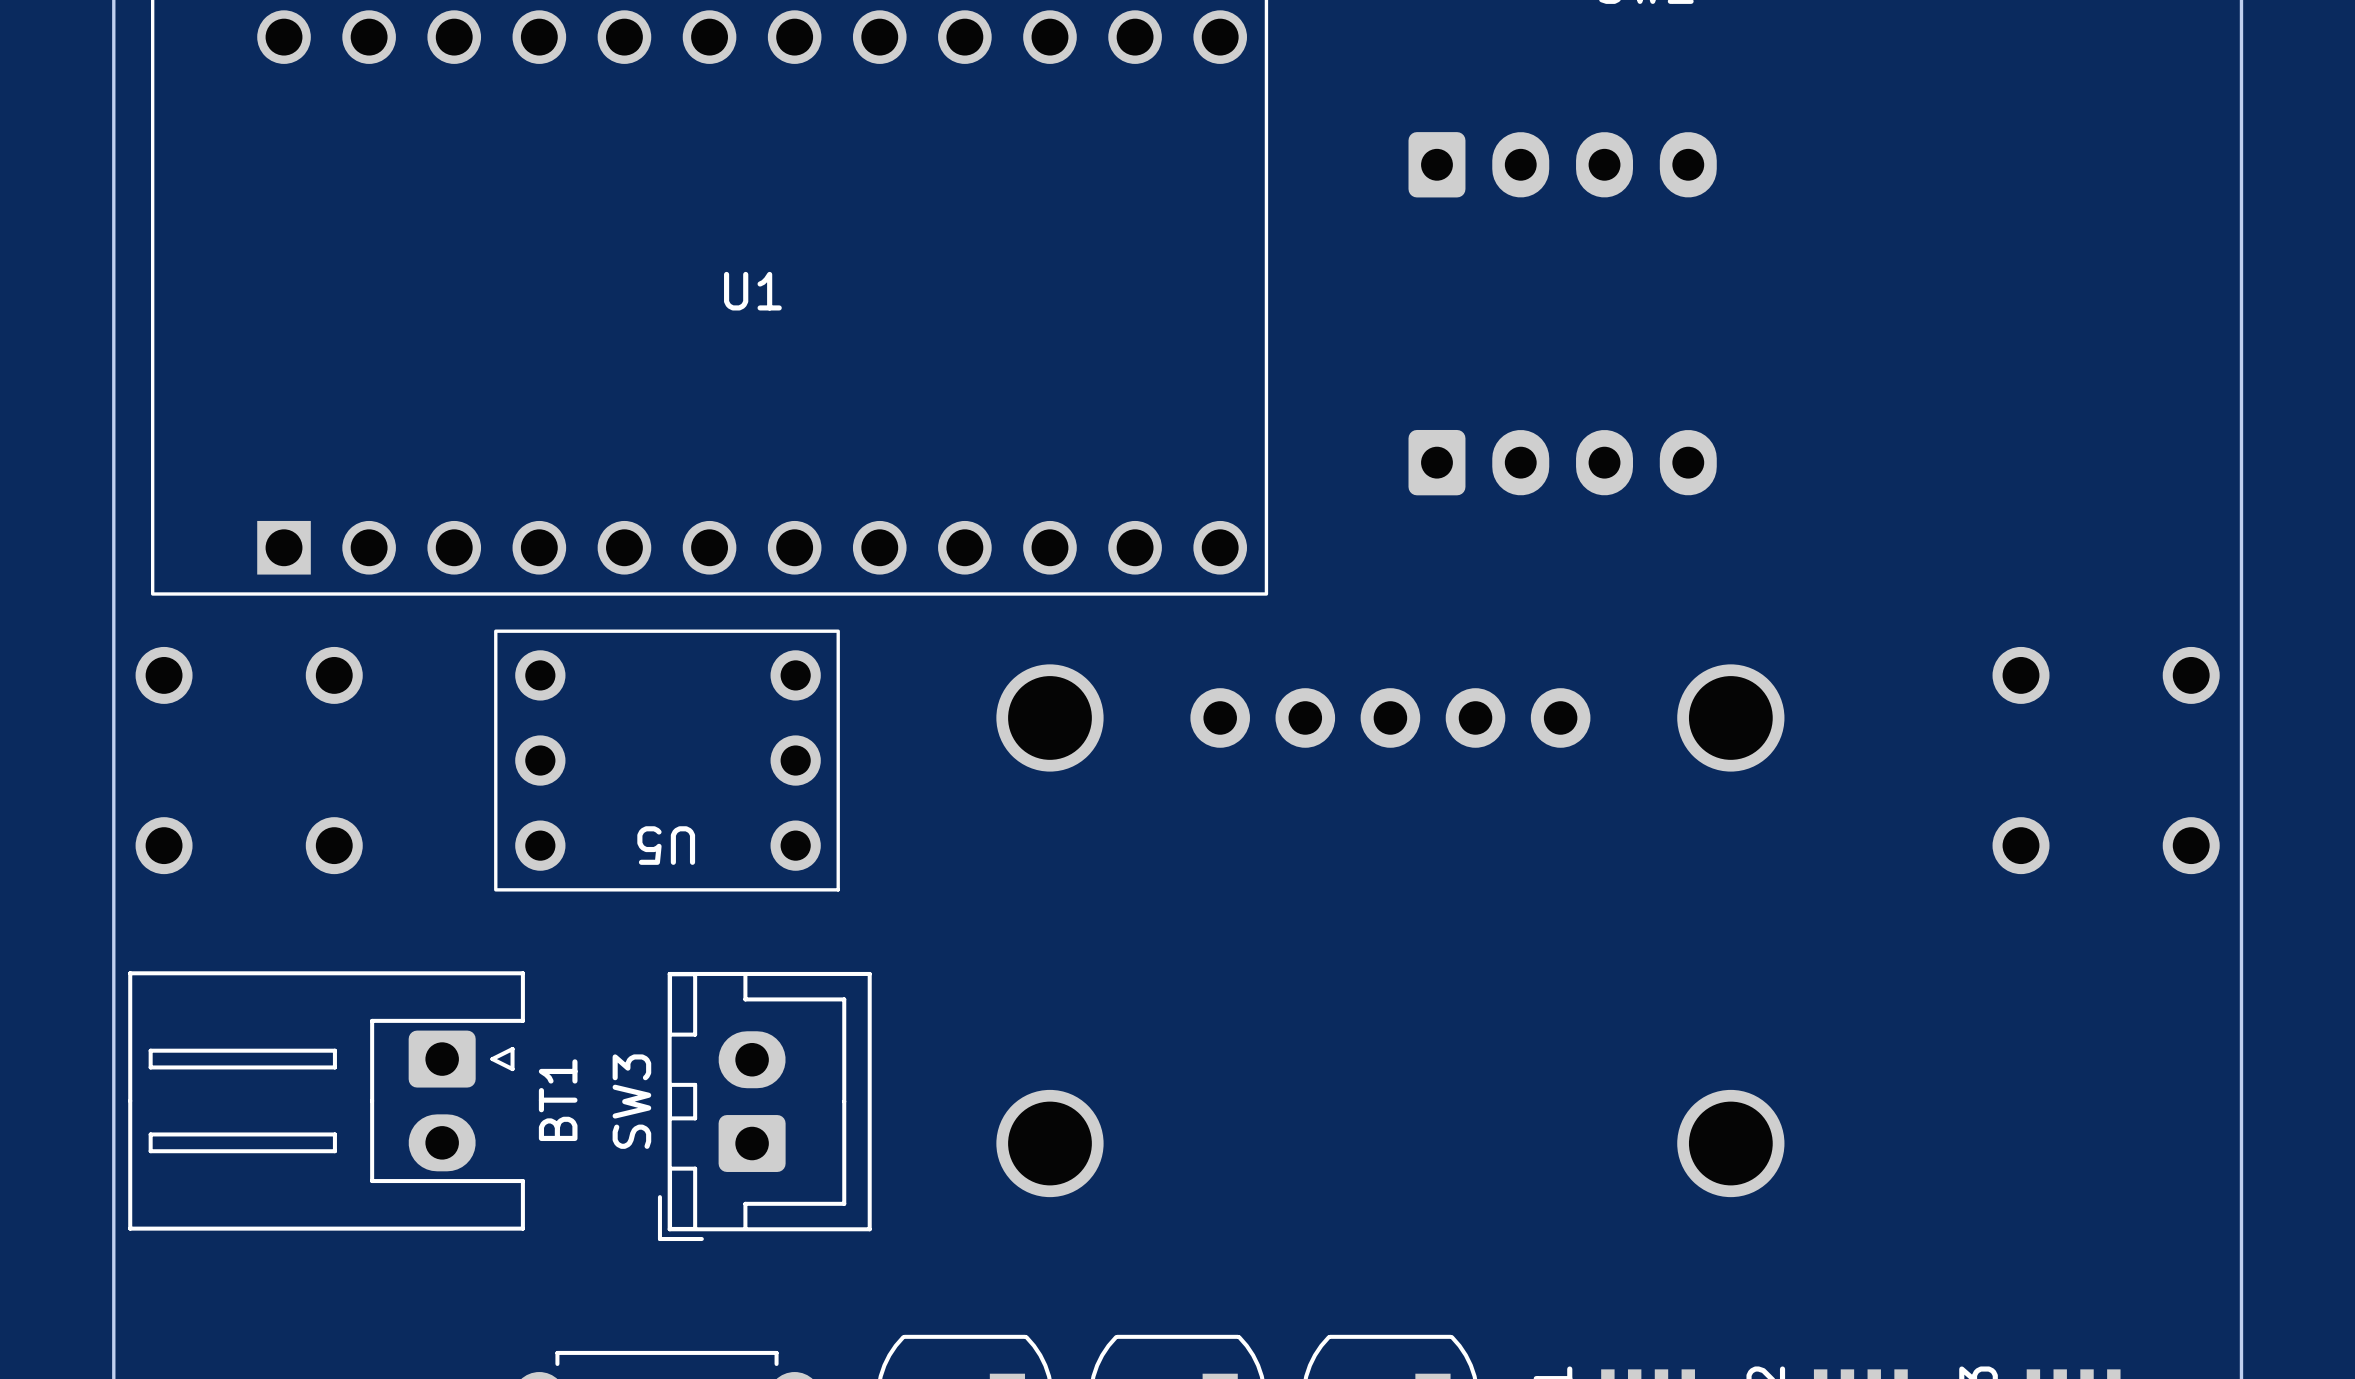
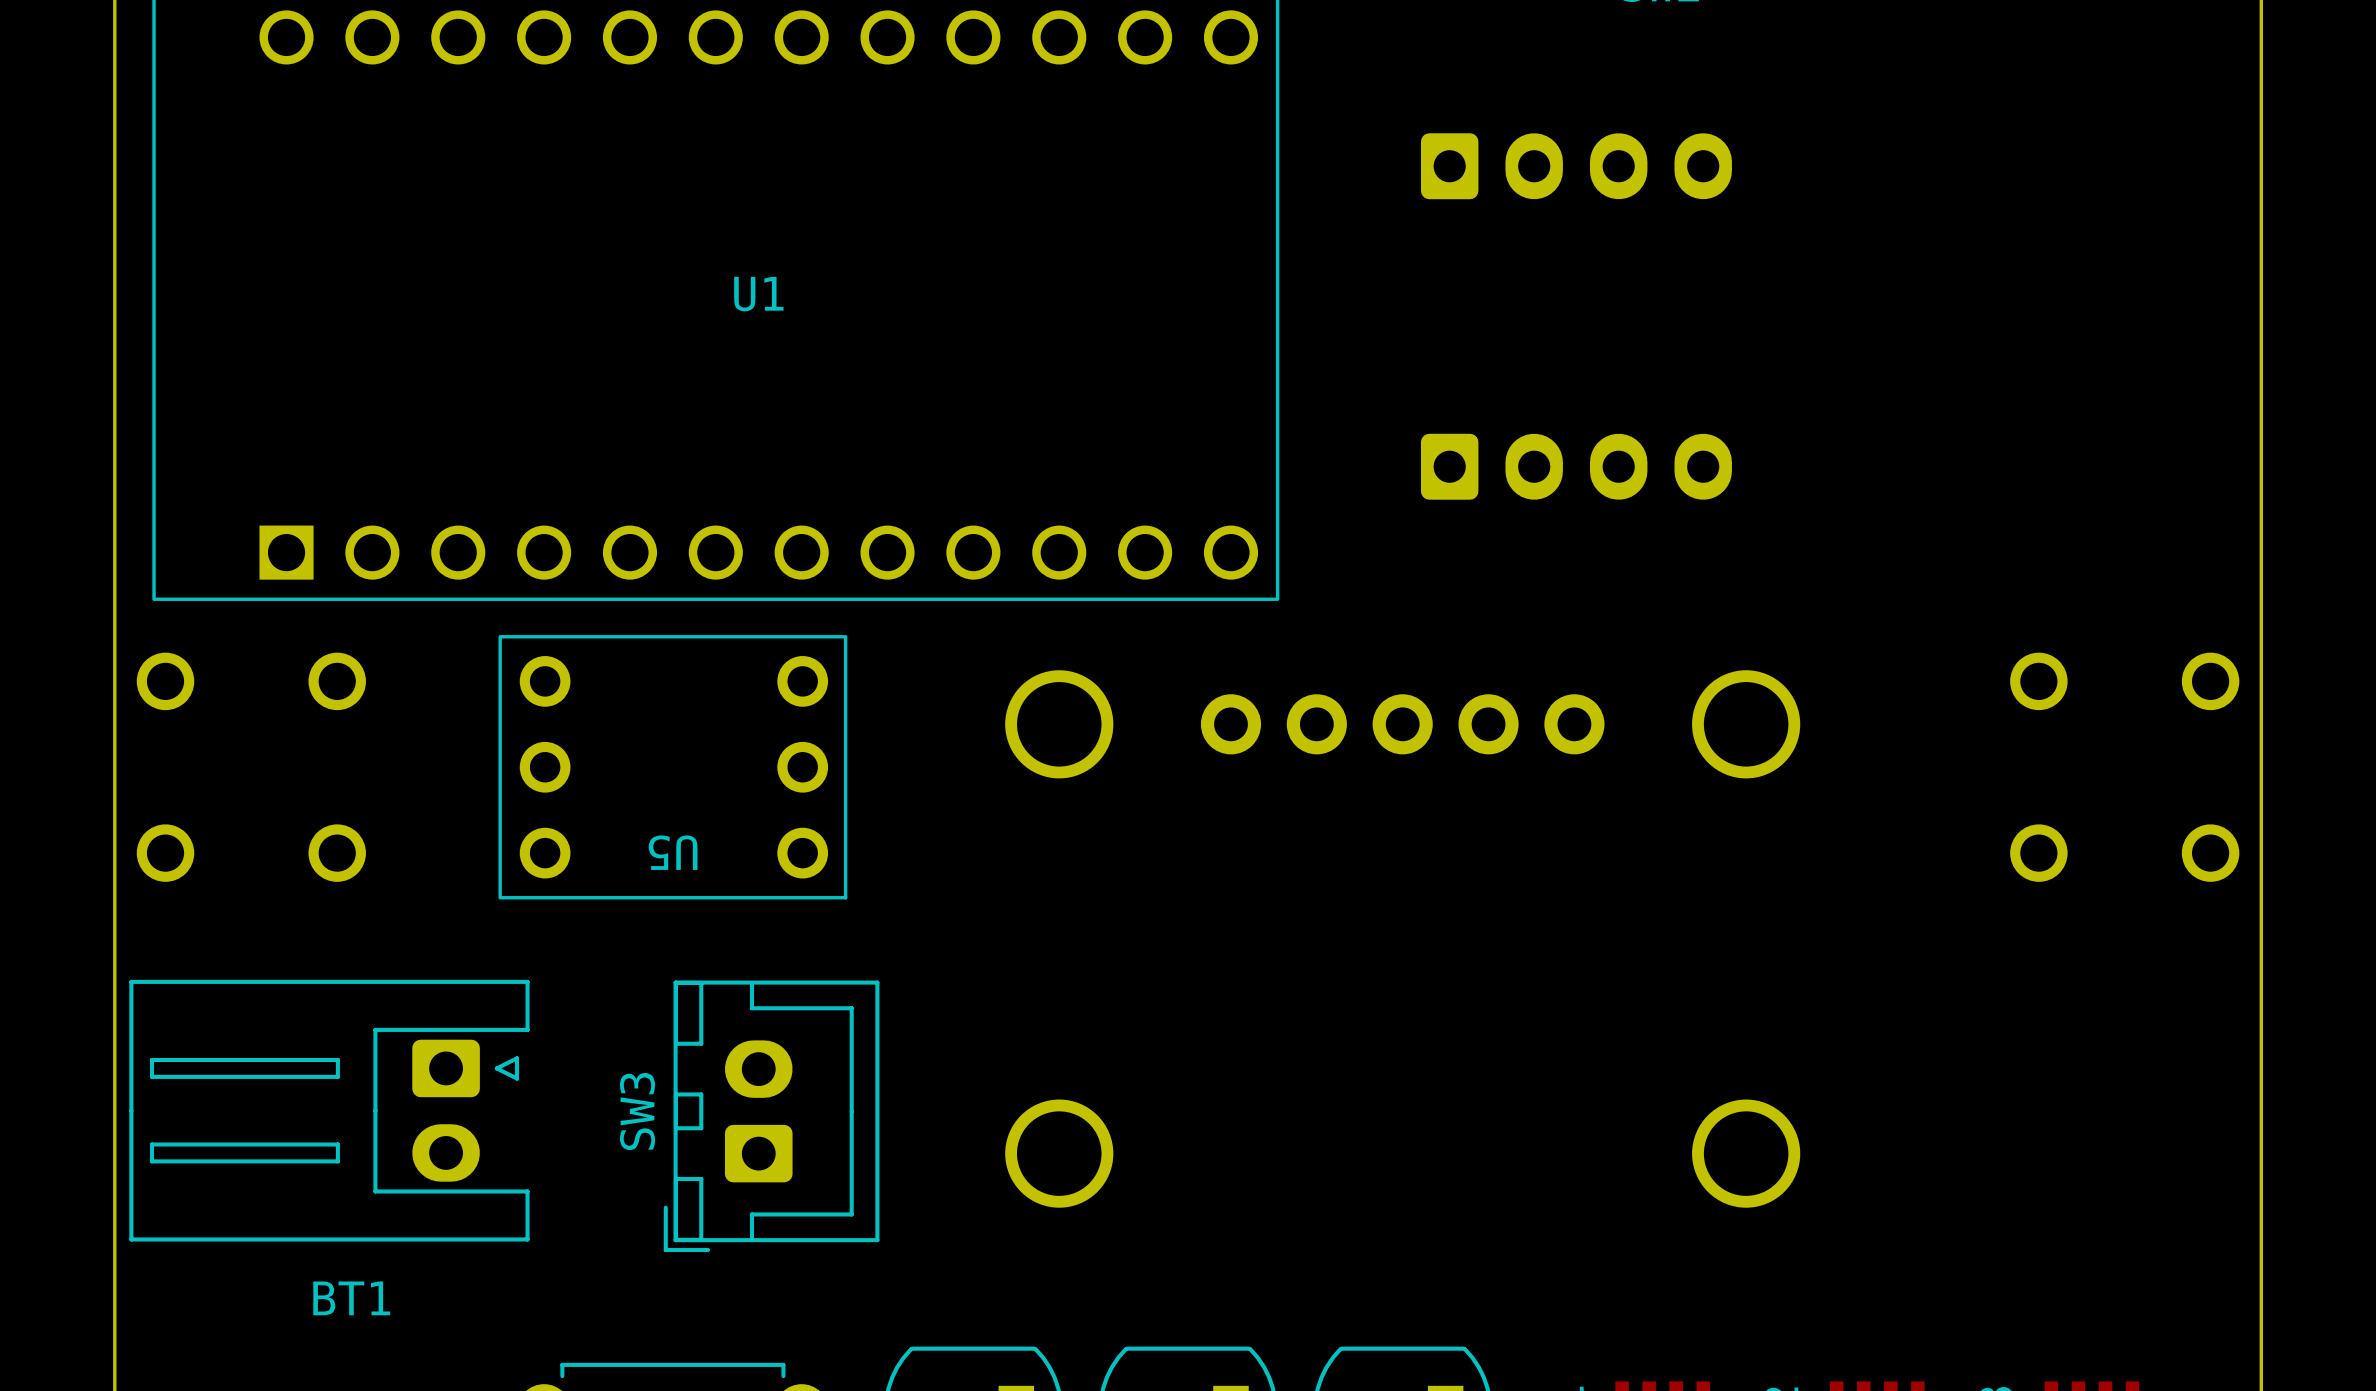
BT1 name rotation: 0° (558, 1100) -> 90° clockwise (351, 1298)
BT1 name position: BT1 (558, 1100) -> BT1 (351, 1298)

